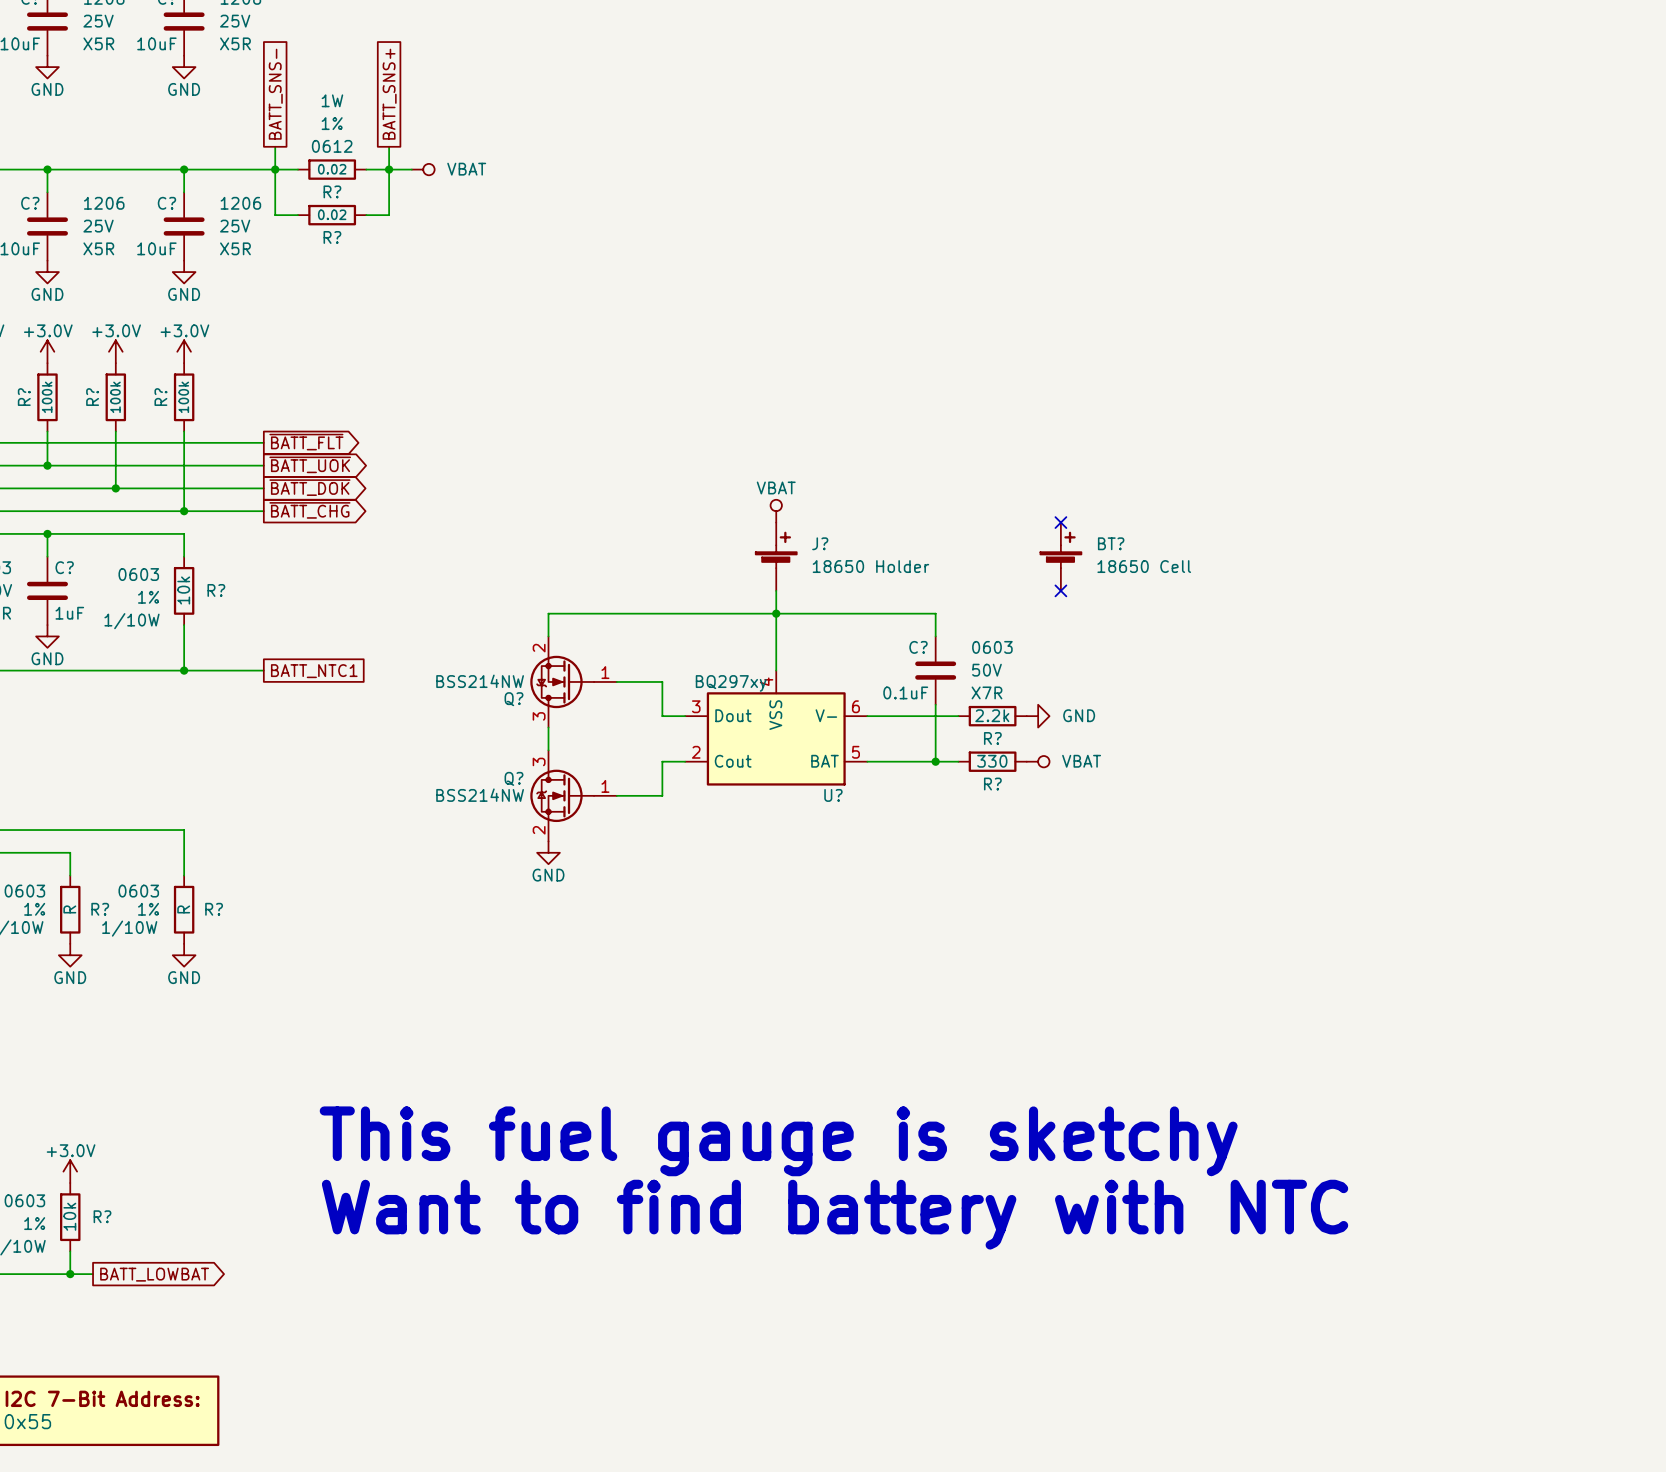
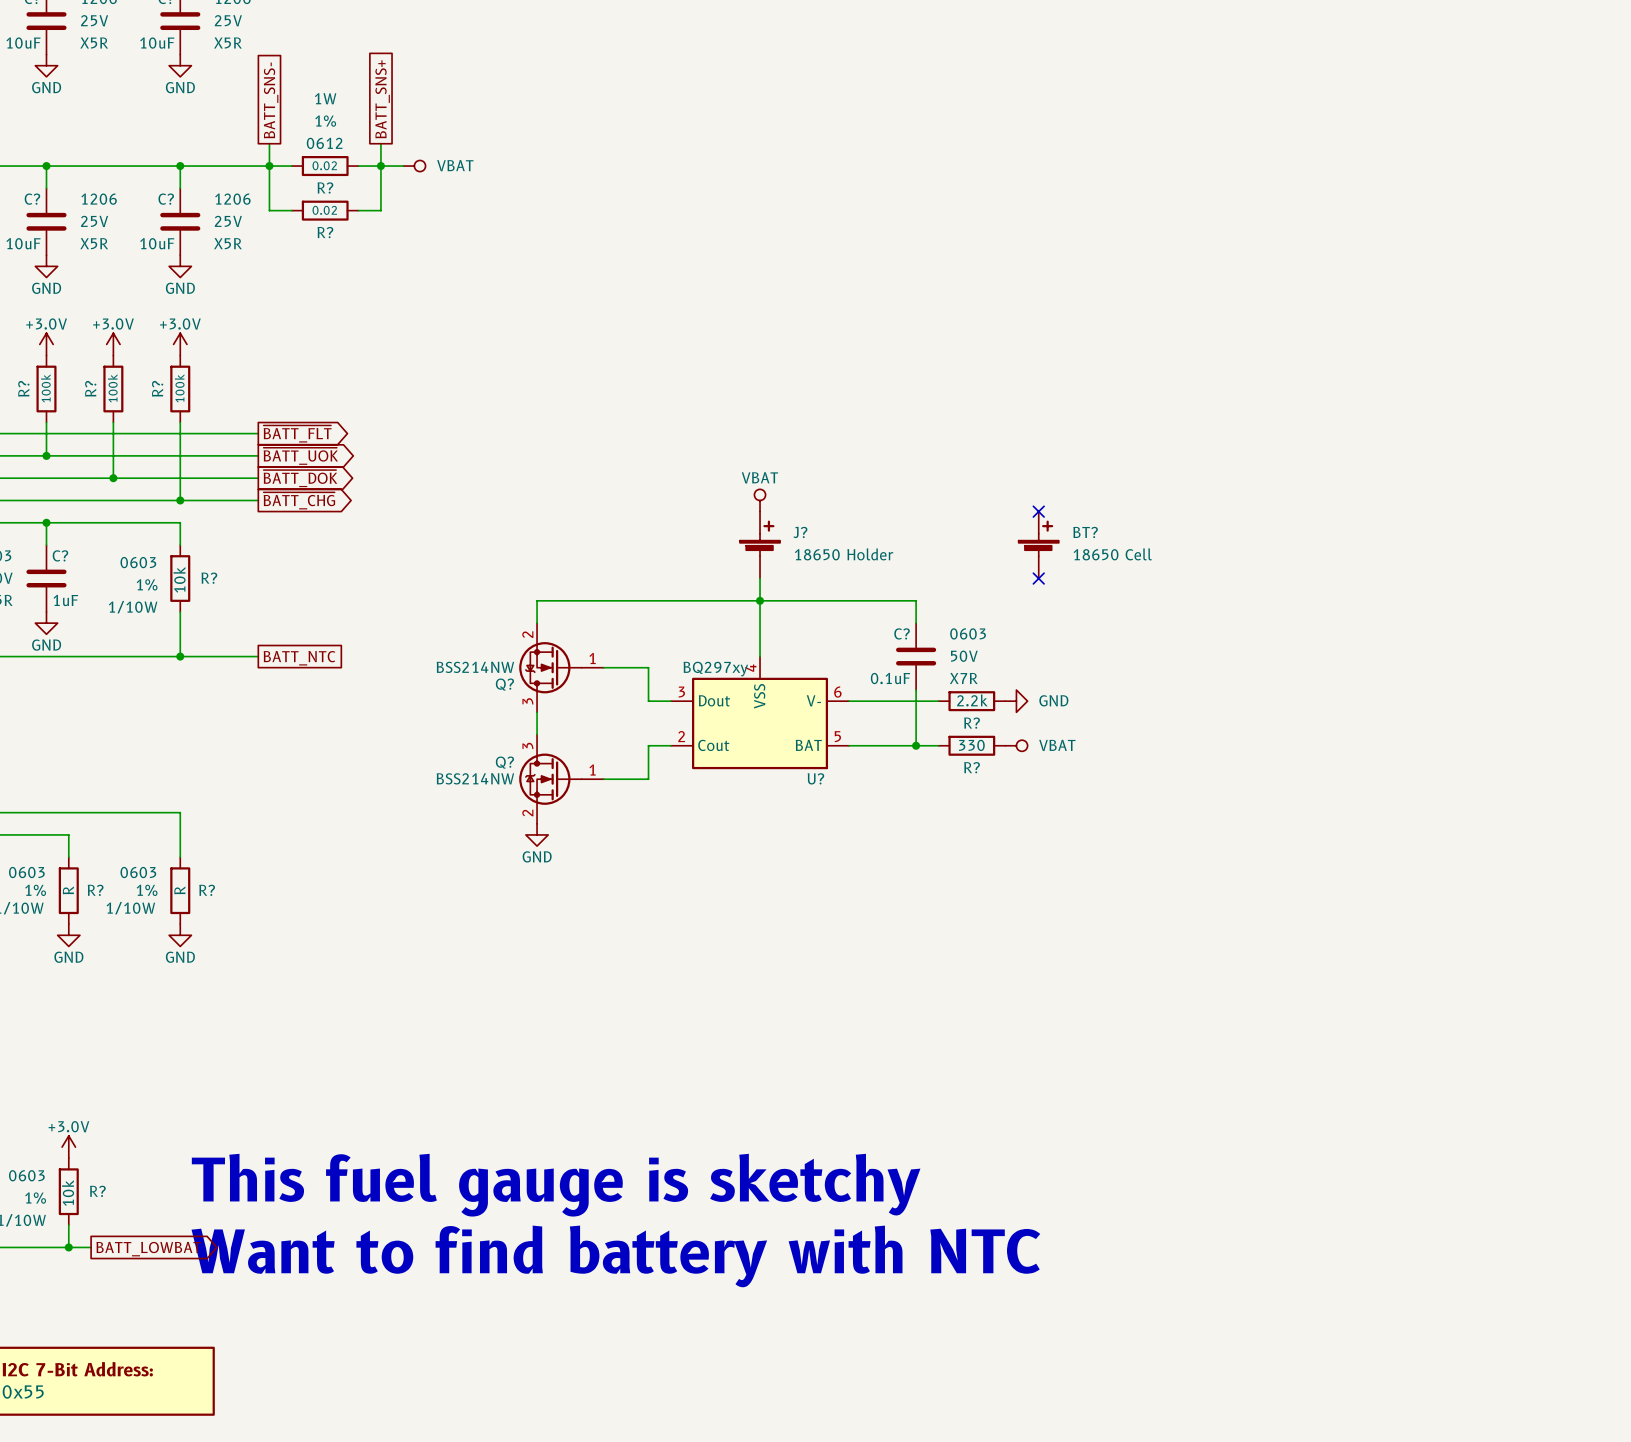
global label: BATT_NTC1 (314, 671) -> BATT_NTC (299, 658)
text position: This fuel gauge is sketchy (778, 1141) -> This fuel gauge is sketchy (556, 1185)
text position: Want to find battery with NTC (835, 1214) -> Want to find battery with NTC (615, 1256)

